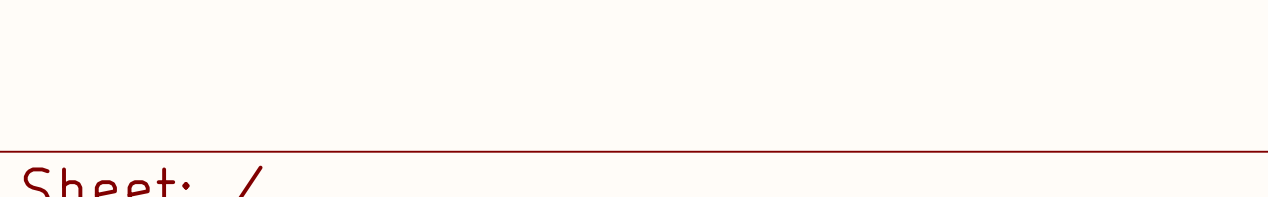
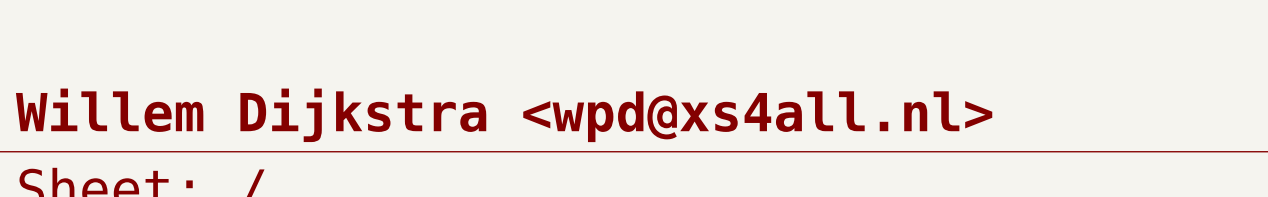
title block: none -> Willem Dijkstra <wpd@xs4all.nl> (504, 115)

